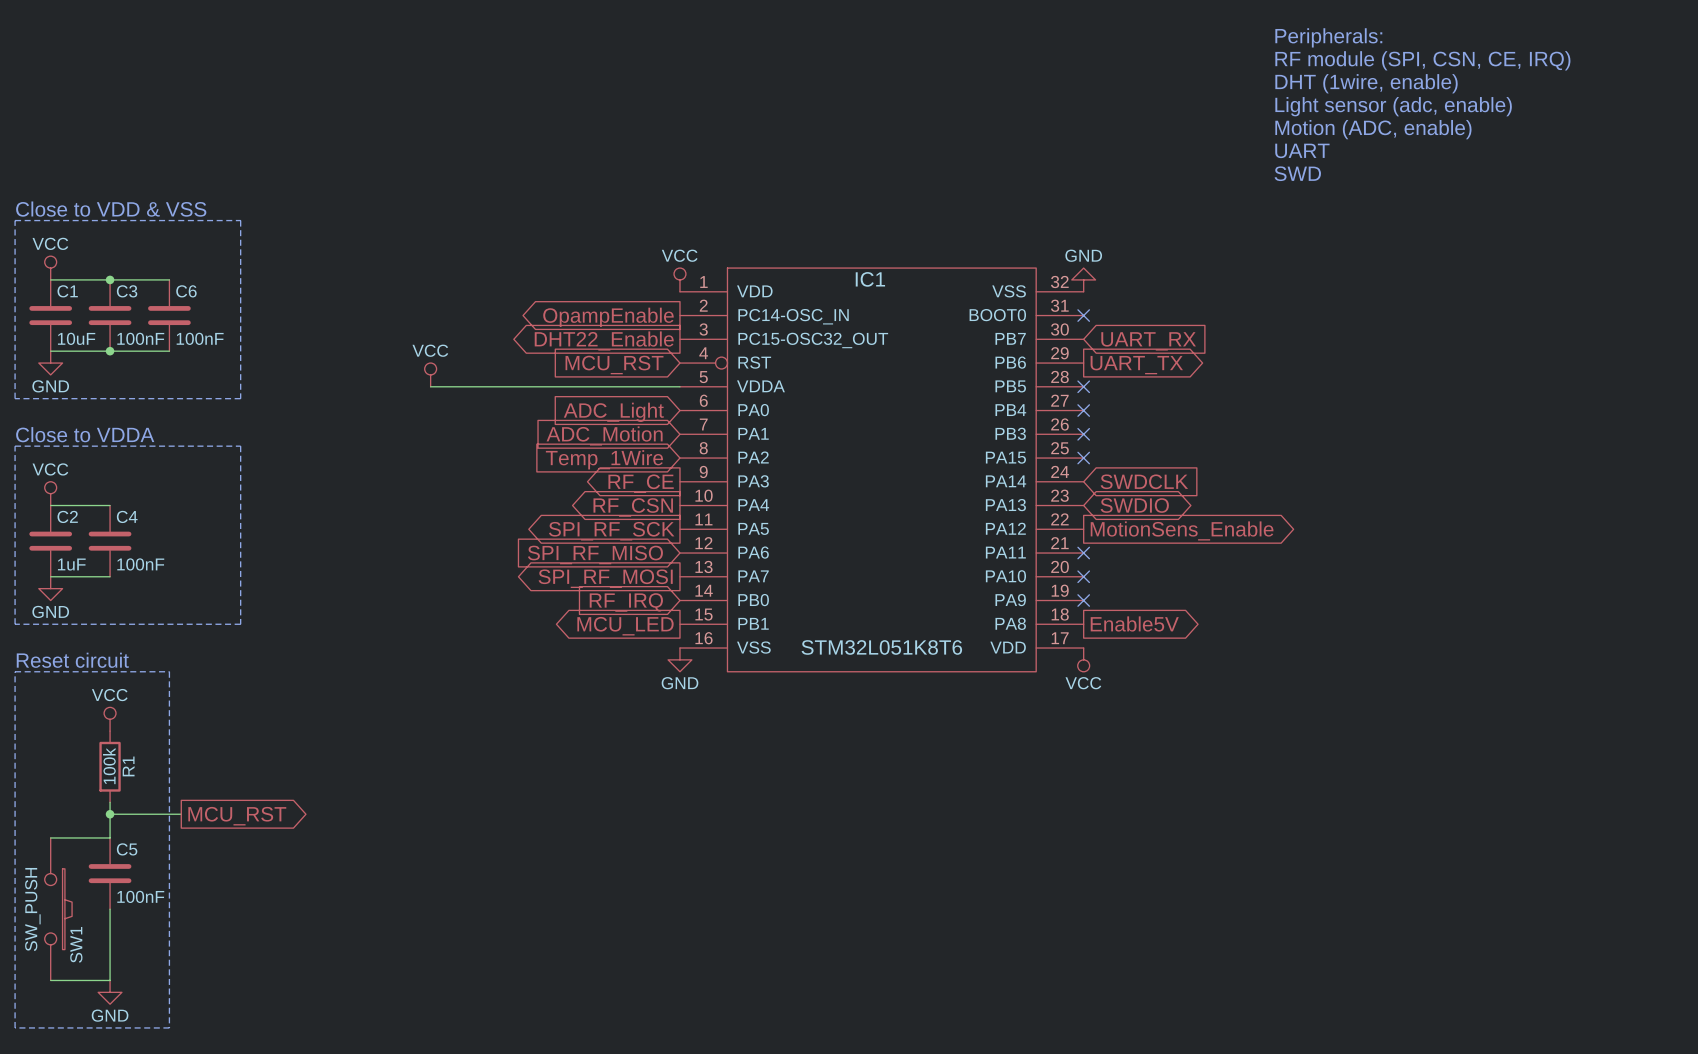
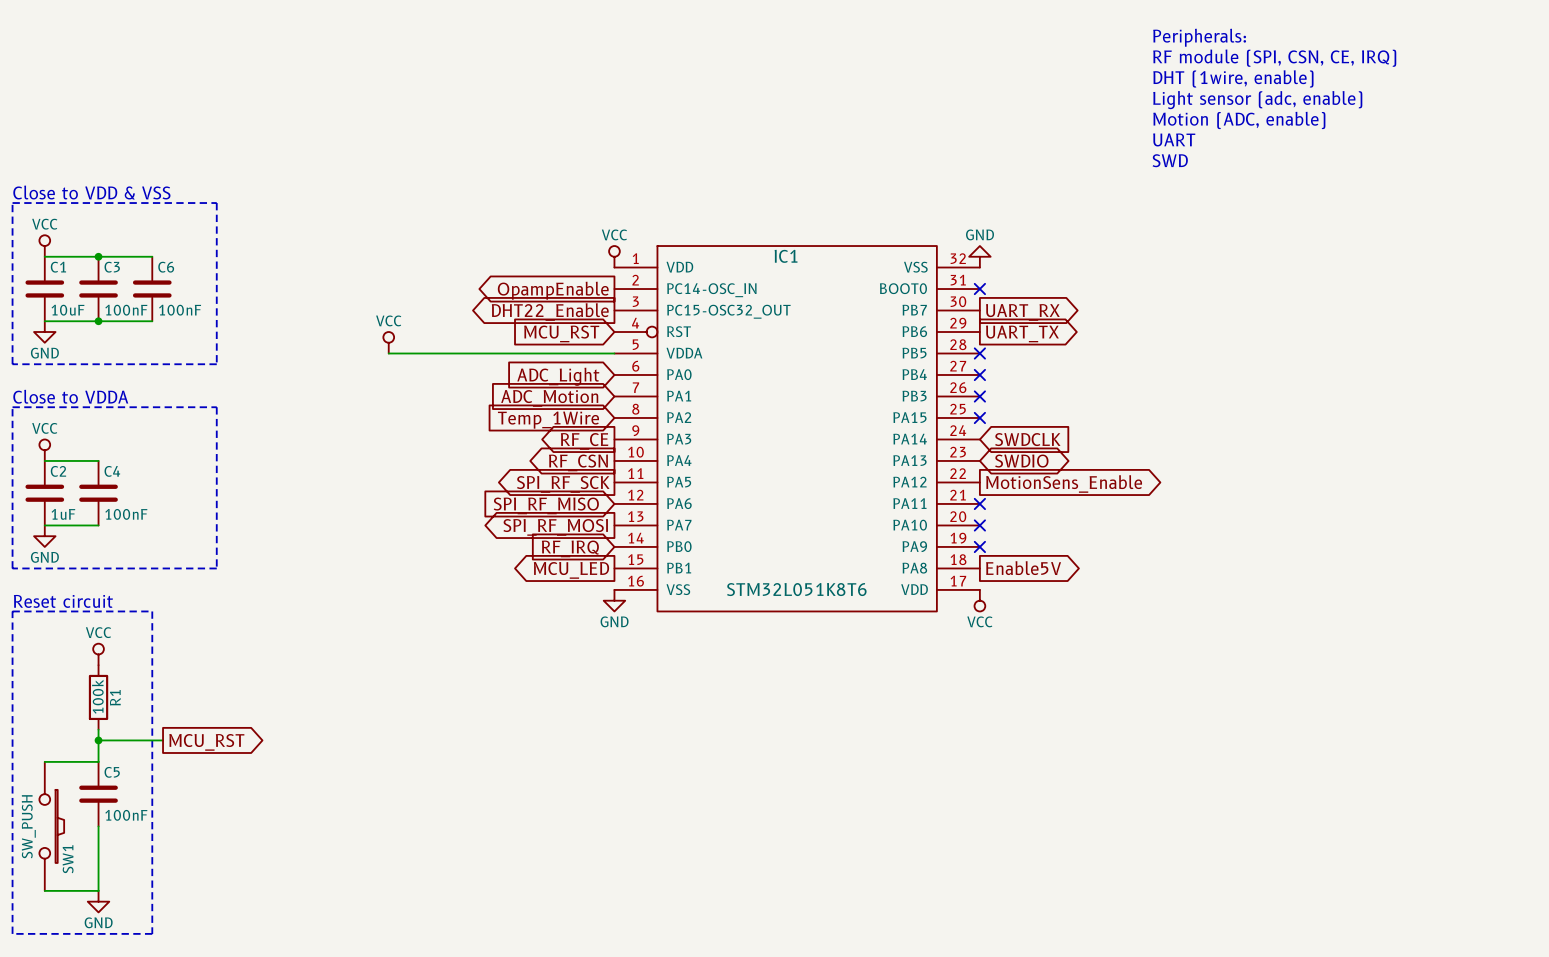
global label shape: input (1148, 341) -> output (1022, 312)

